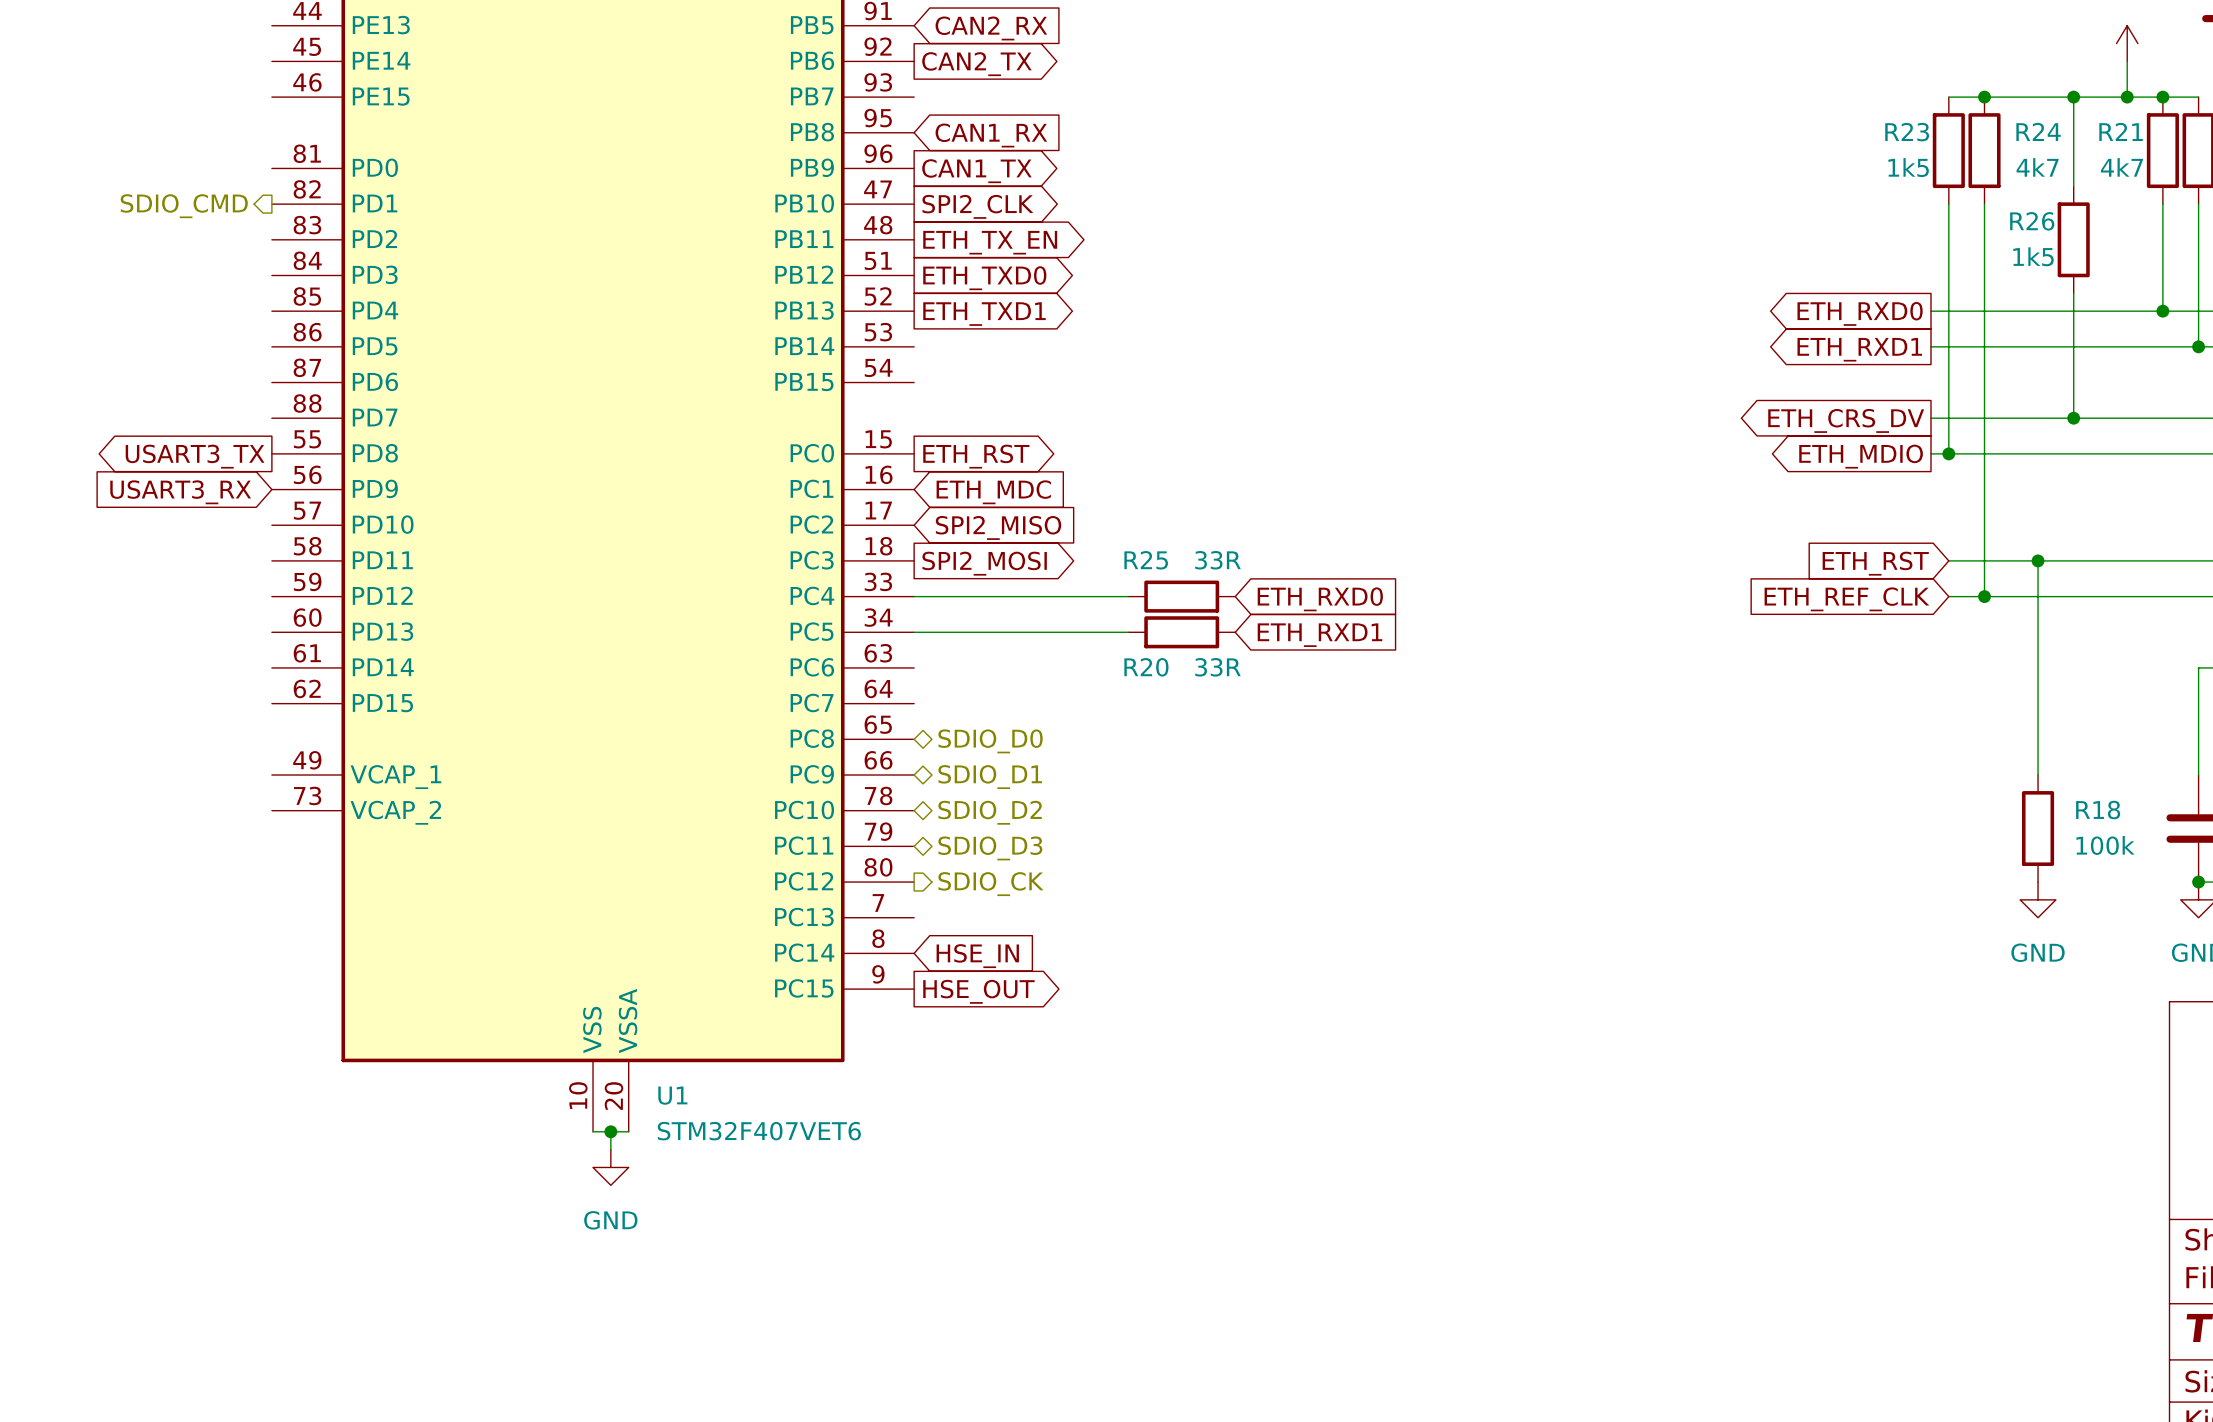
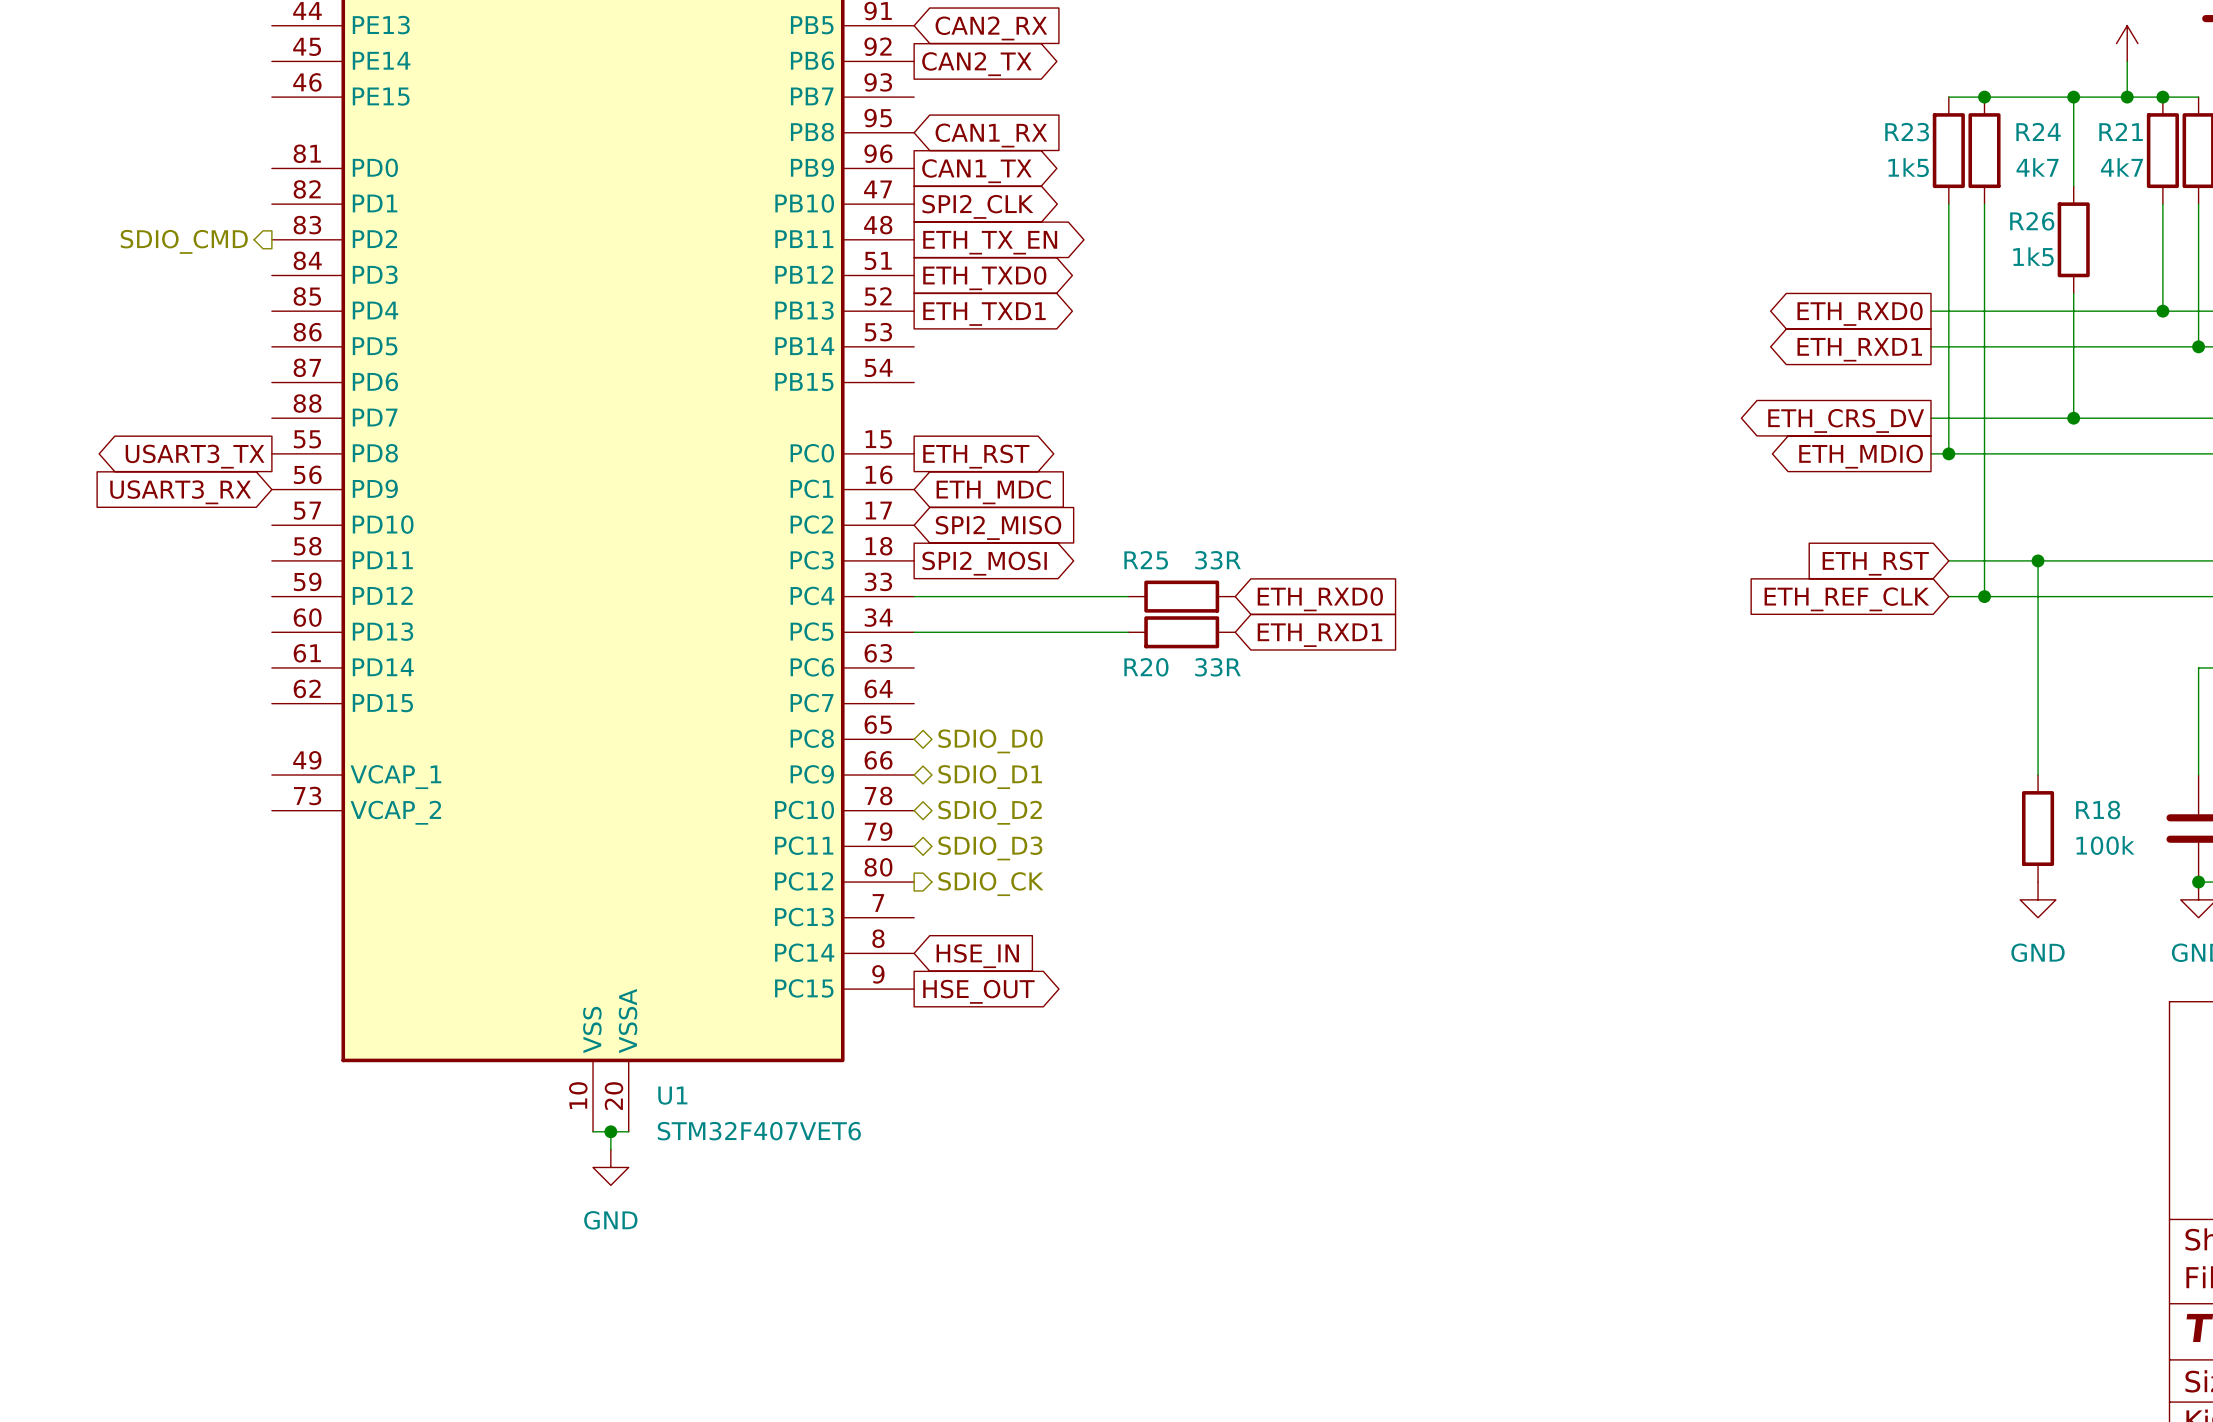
hierarchical label position: SDIO_CMD (184, 206) -> SDIO_CMD (184, 241)

